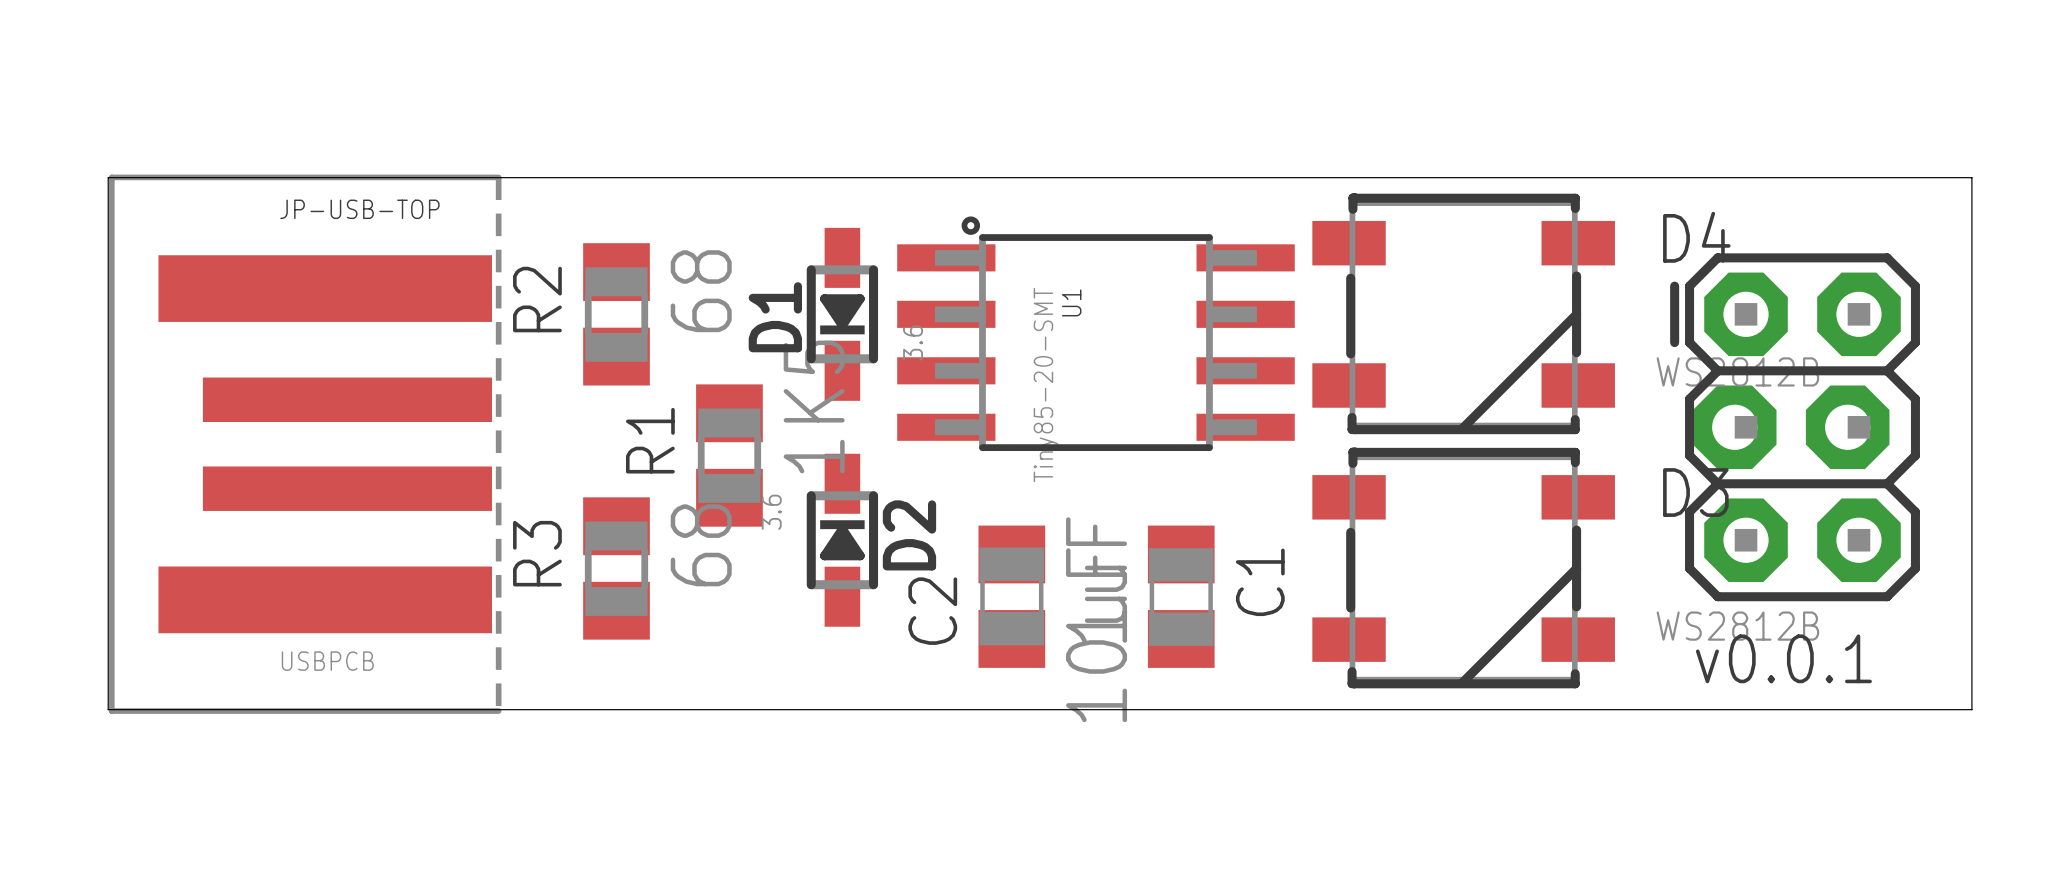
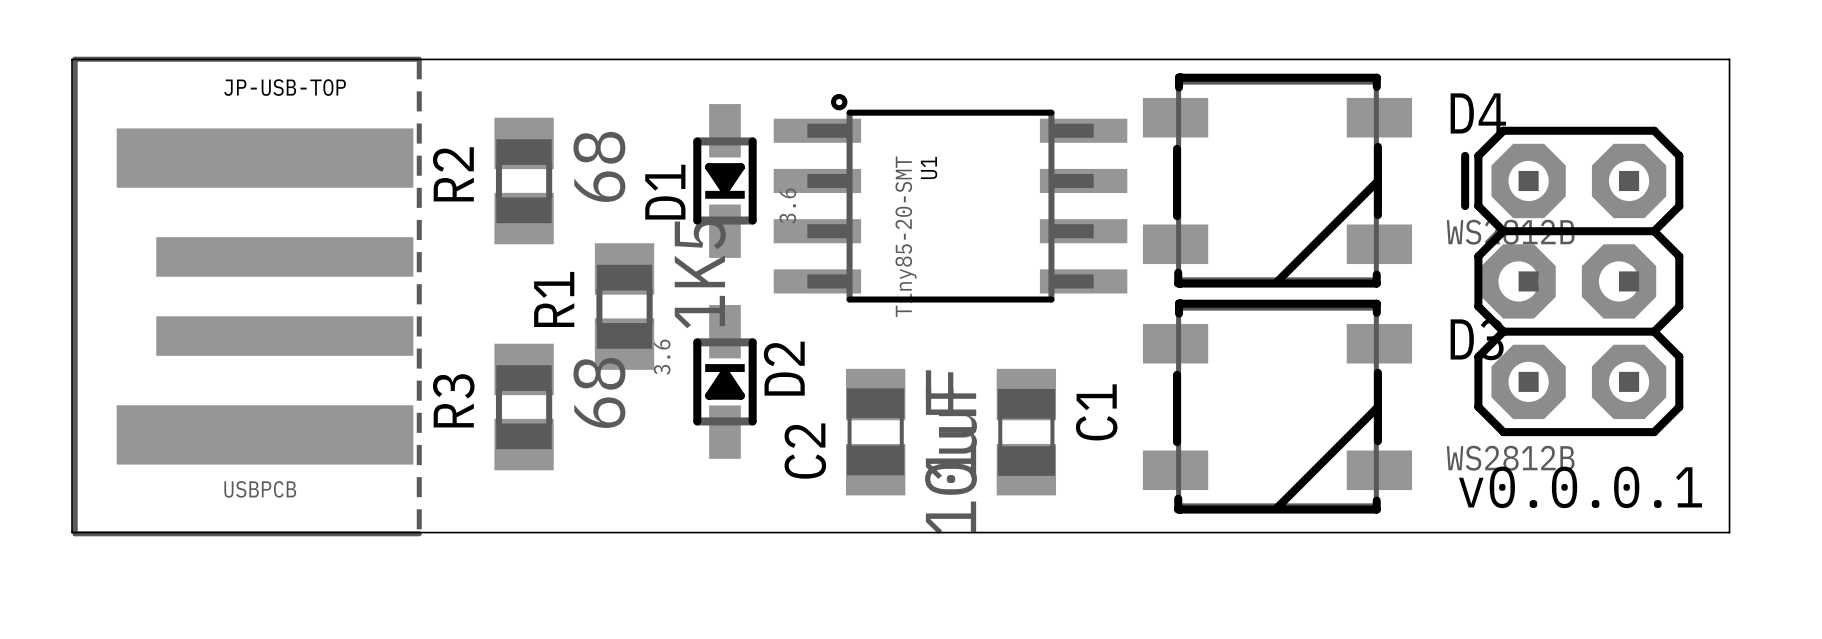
text: v0.0.1 (1783, 658) -> v0.0.0.1 (1580, 487)

